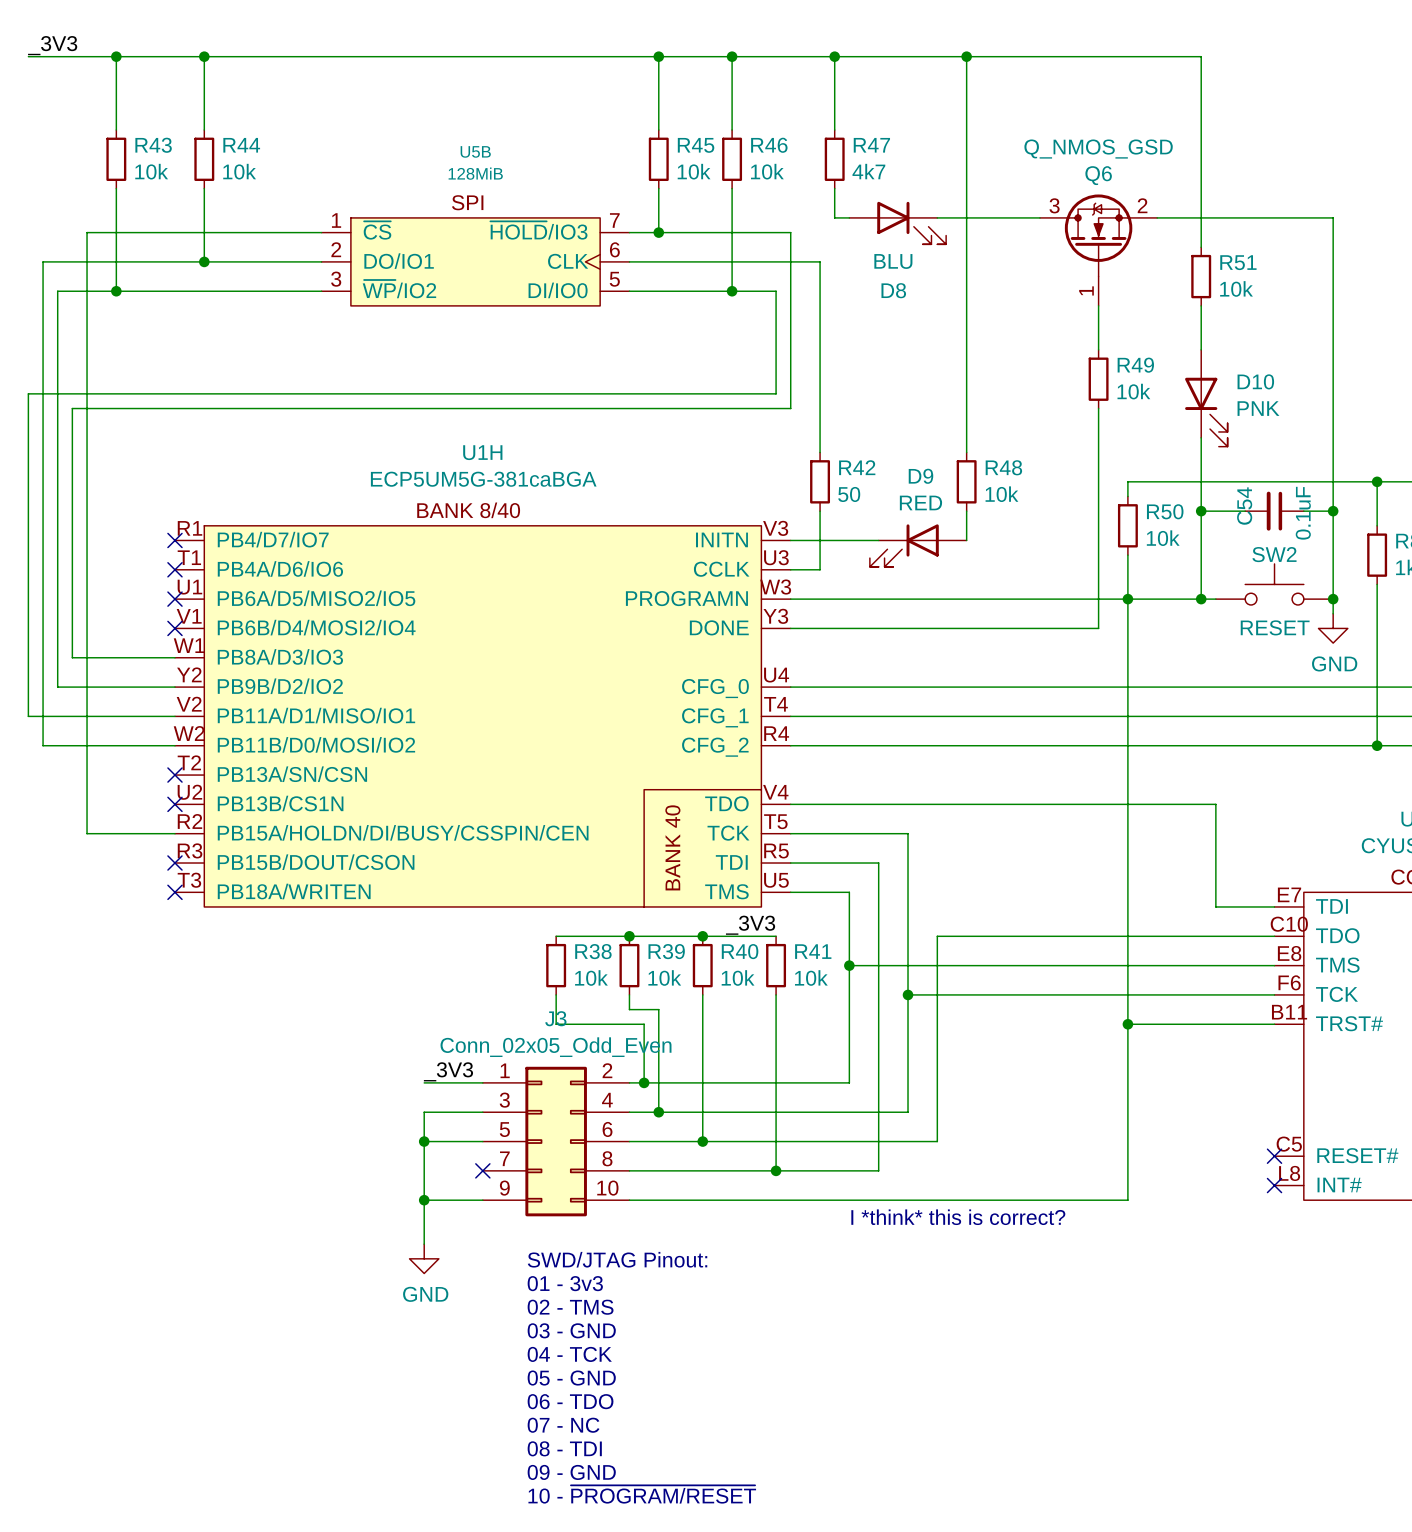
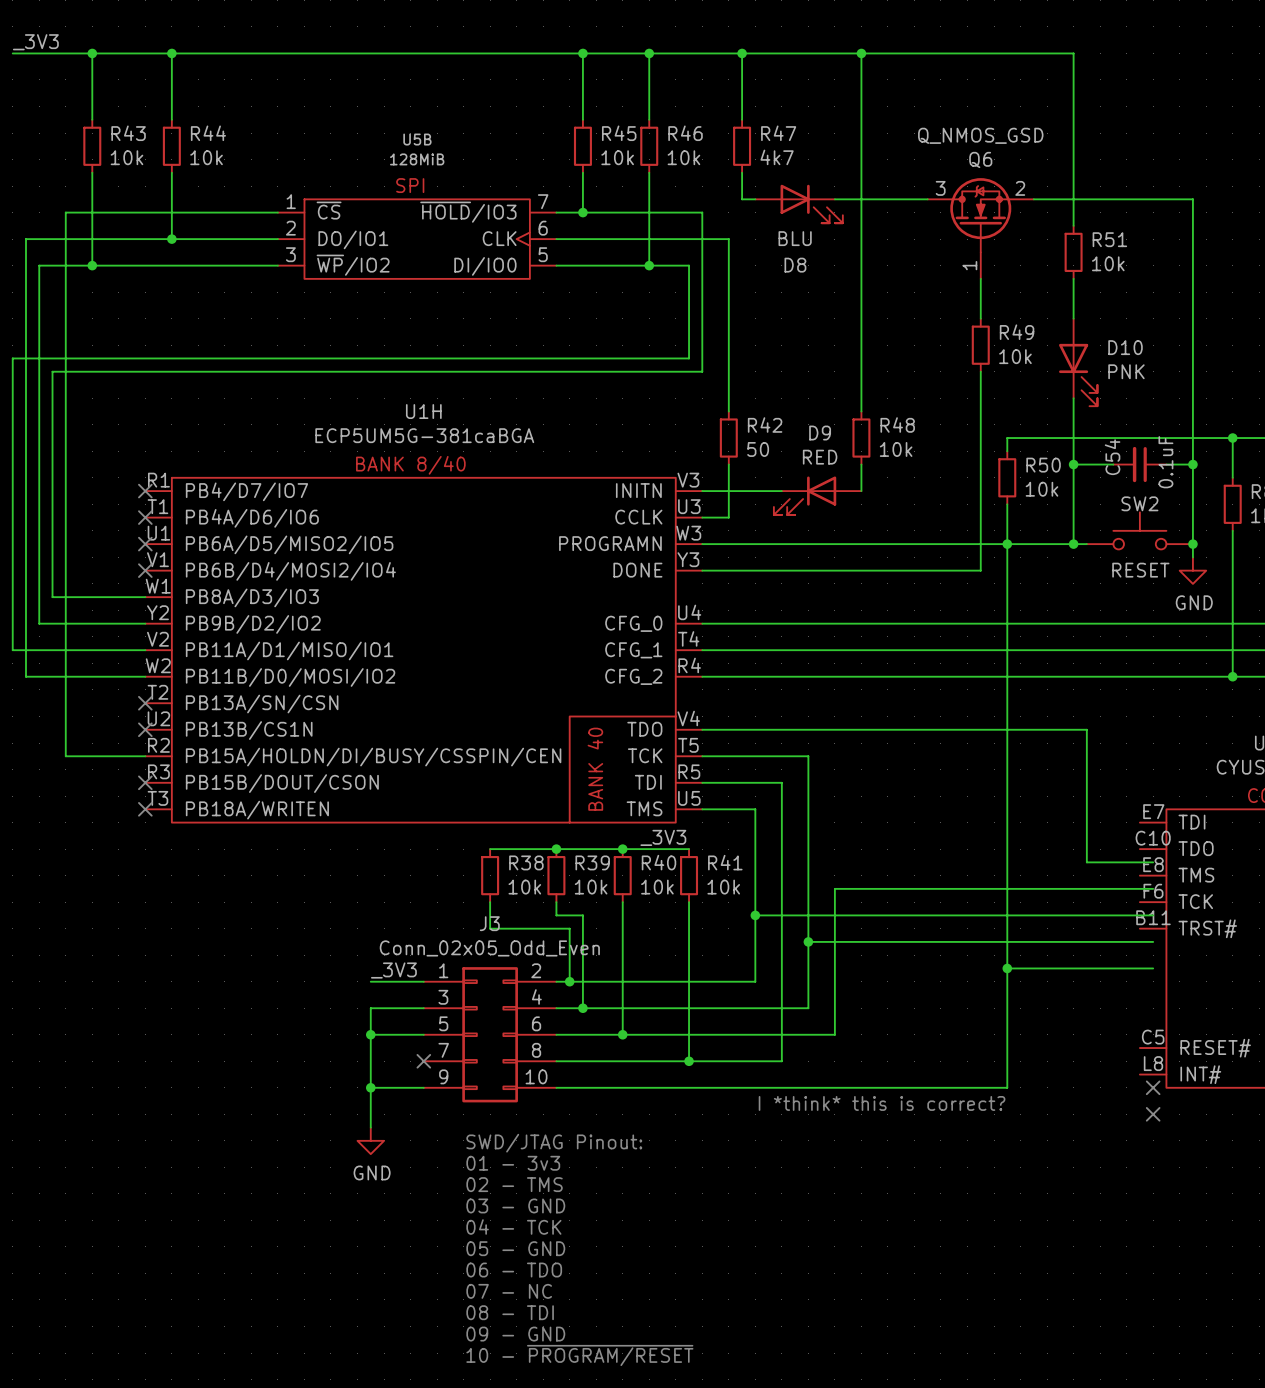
wire: (1215, 906) (1274, 906) -> (1086, 822) (1086, 862) (1153, 862)
wire: (1274, 936) (937, 936) (937, 980) -> (1153, 888) (834, 888)
wire: (849, 965) (1274, 965) -> none
junction: (849, 965) -> none
wire: (908, 994) (1274, 994) -> none
junction: (908, 994) -> none
wire: none -> (755, 915) (1153, 915)
junction: none -> (755, 915)
wire: (1127, 1024) (1274, 1024) -> none
junction position: (1127, 1024) -> (1007, 968)
wire: none -> (808, 941) (1153, 941)
junction: none -> (808, 941)
wire: none -> (1007, 968) (1153, 968)
no-connect mark: (1274, 1156) -> none
no-connect mark position: (1274, 1185) -> (1153, 1087)
no-connect mark: none -> (1153, 1114)

